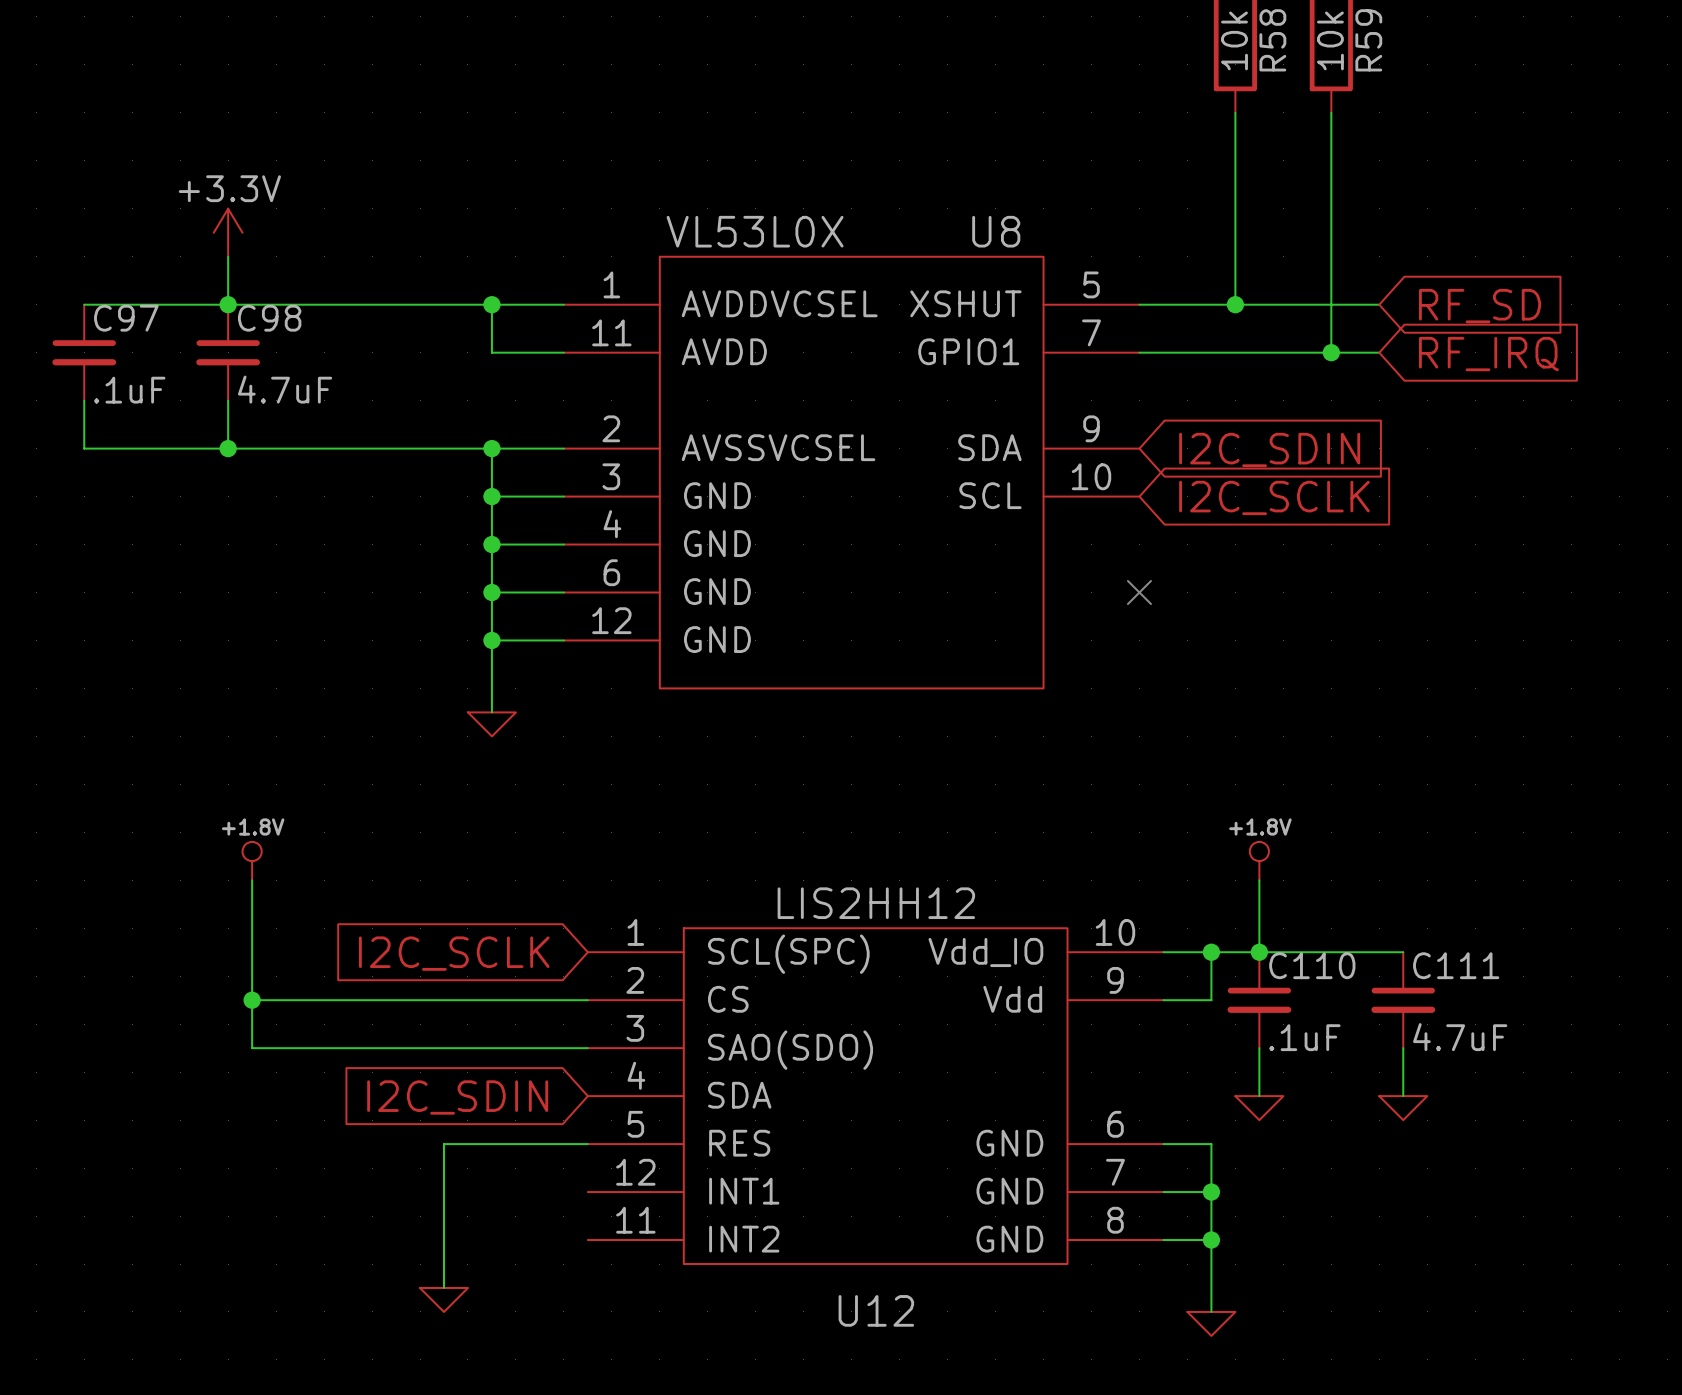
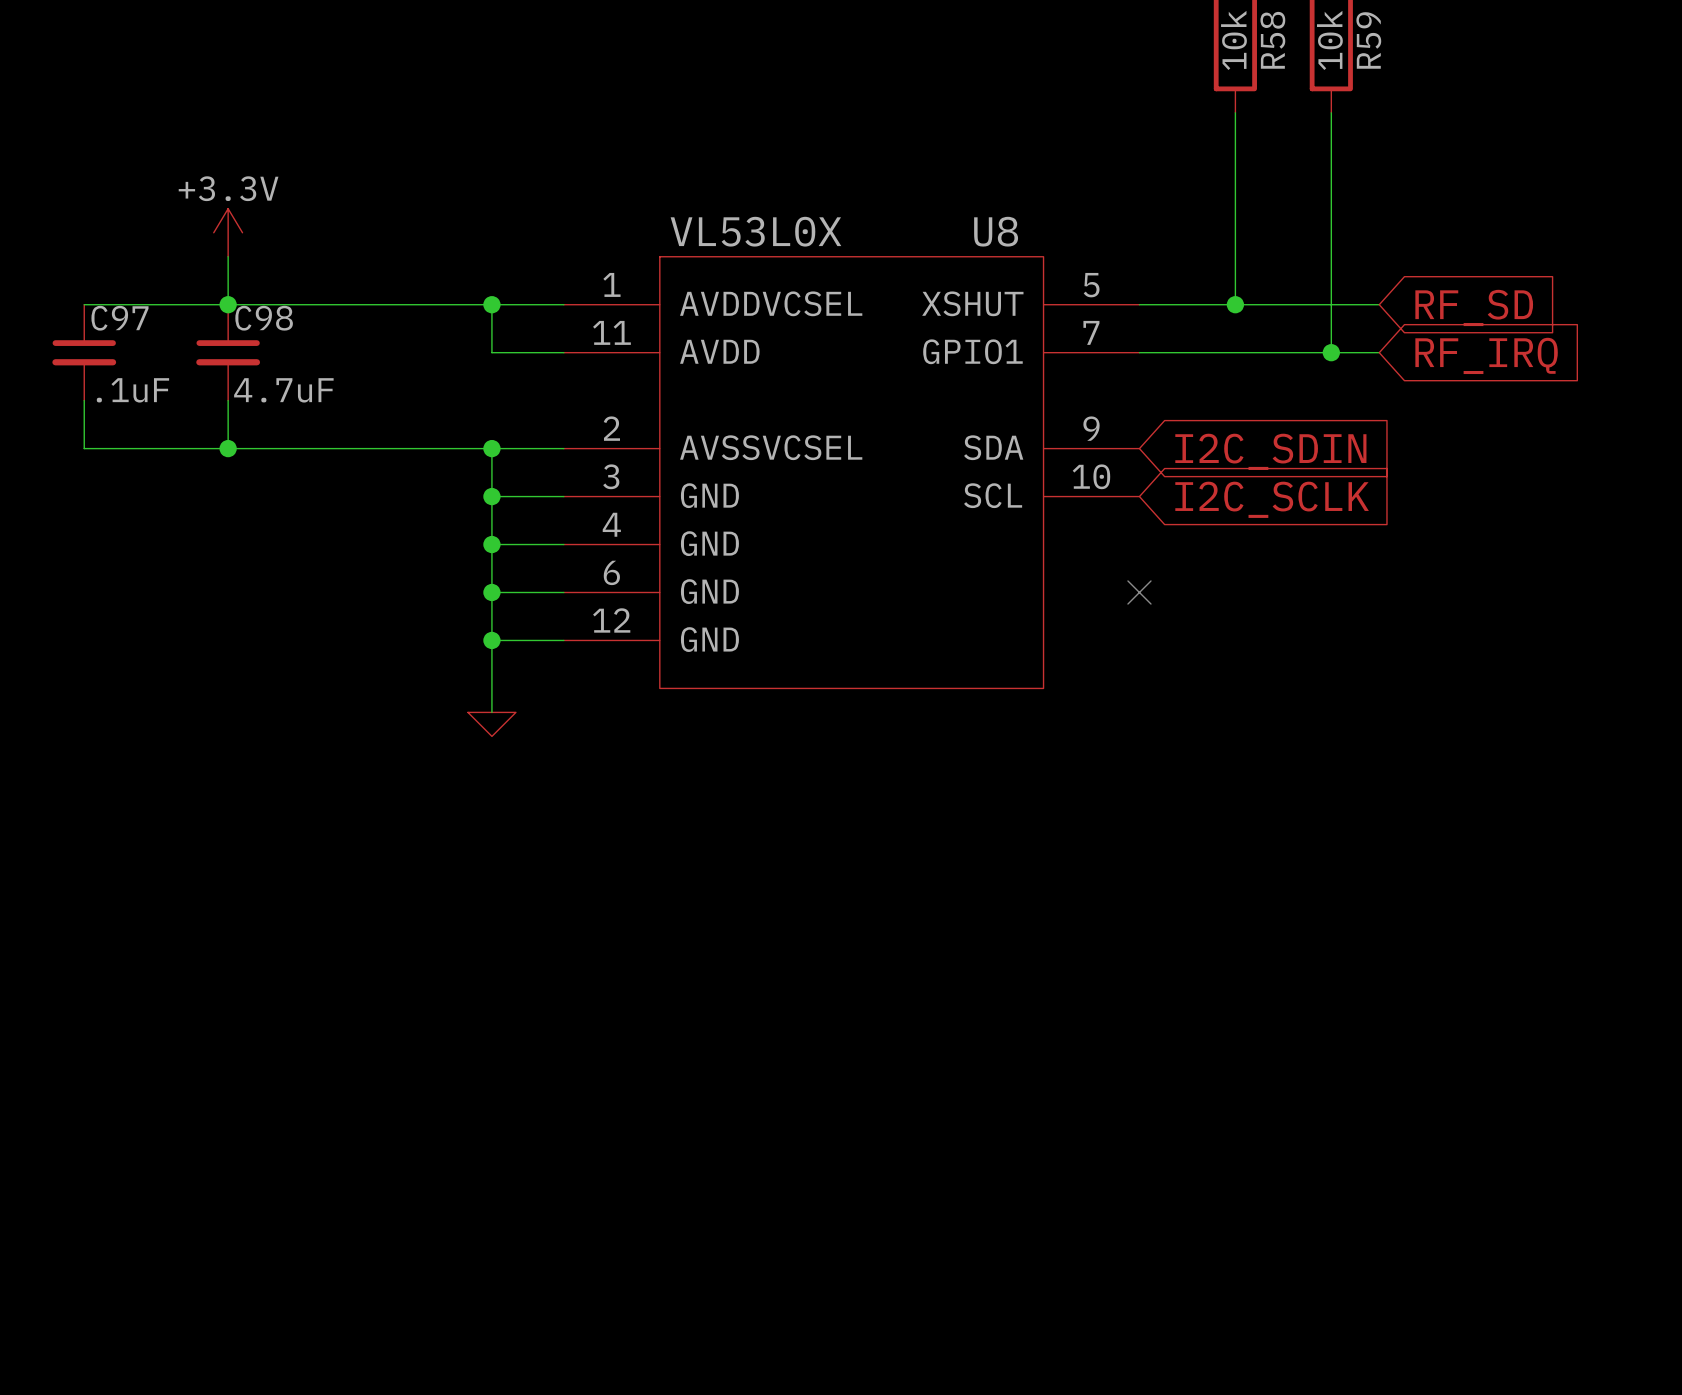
power symbol: +1.8V (252, 861) -> none
power symbol: +1.8V (1259, 861) -> none
wire: (252, 880) (252, 1048) (587, 1048) -> none
wire: (1259, 880) (1259, 952) -> none
wire: (1163, 952) (1403, 952) -> none
wire: (1211, 952) (1211, 1000) (1163, 1000) -> none
junction: (1211, 952) -> none
junction: (1259, 952) -> none
global label: I2C_SCLK (454, 953) -> none
wire: (252, 1000) (587, 1000) -> none
junction: (252, 1000) -> none
C110: .1uF (1259, 1000) -> none
C111: 4.7uF (1403, 1000) -> none
wire: (1259, 1048) (1259, 1096) -> none
wire: (1403, 1048) (1403, 1096) -> none
U12: LIS2HH12 (875, 1096) -> none
global label: I2C_SDIN (457, 1097) -> none
power symbol: (1259, 1108) -> none
power symbol: (1403, 1108) -> none
wire: (587, 1144) (443, 1144) (443, 1287) -> none
wire: (1163, 1144) (1211, 1144) (1211, 1311) -> none
wire: (1163, 1192) (1211, 1192) -> none
junction: (1211, 1192) -> none
wire: (1163, 1240) (1211, 1240) -> none
junction: (1211, 1240) -> none
power symbol: (443, 1299) -> none
power symbol: (1211, 1323) -> none

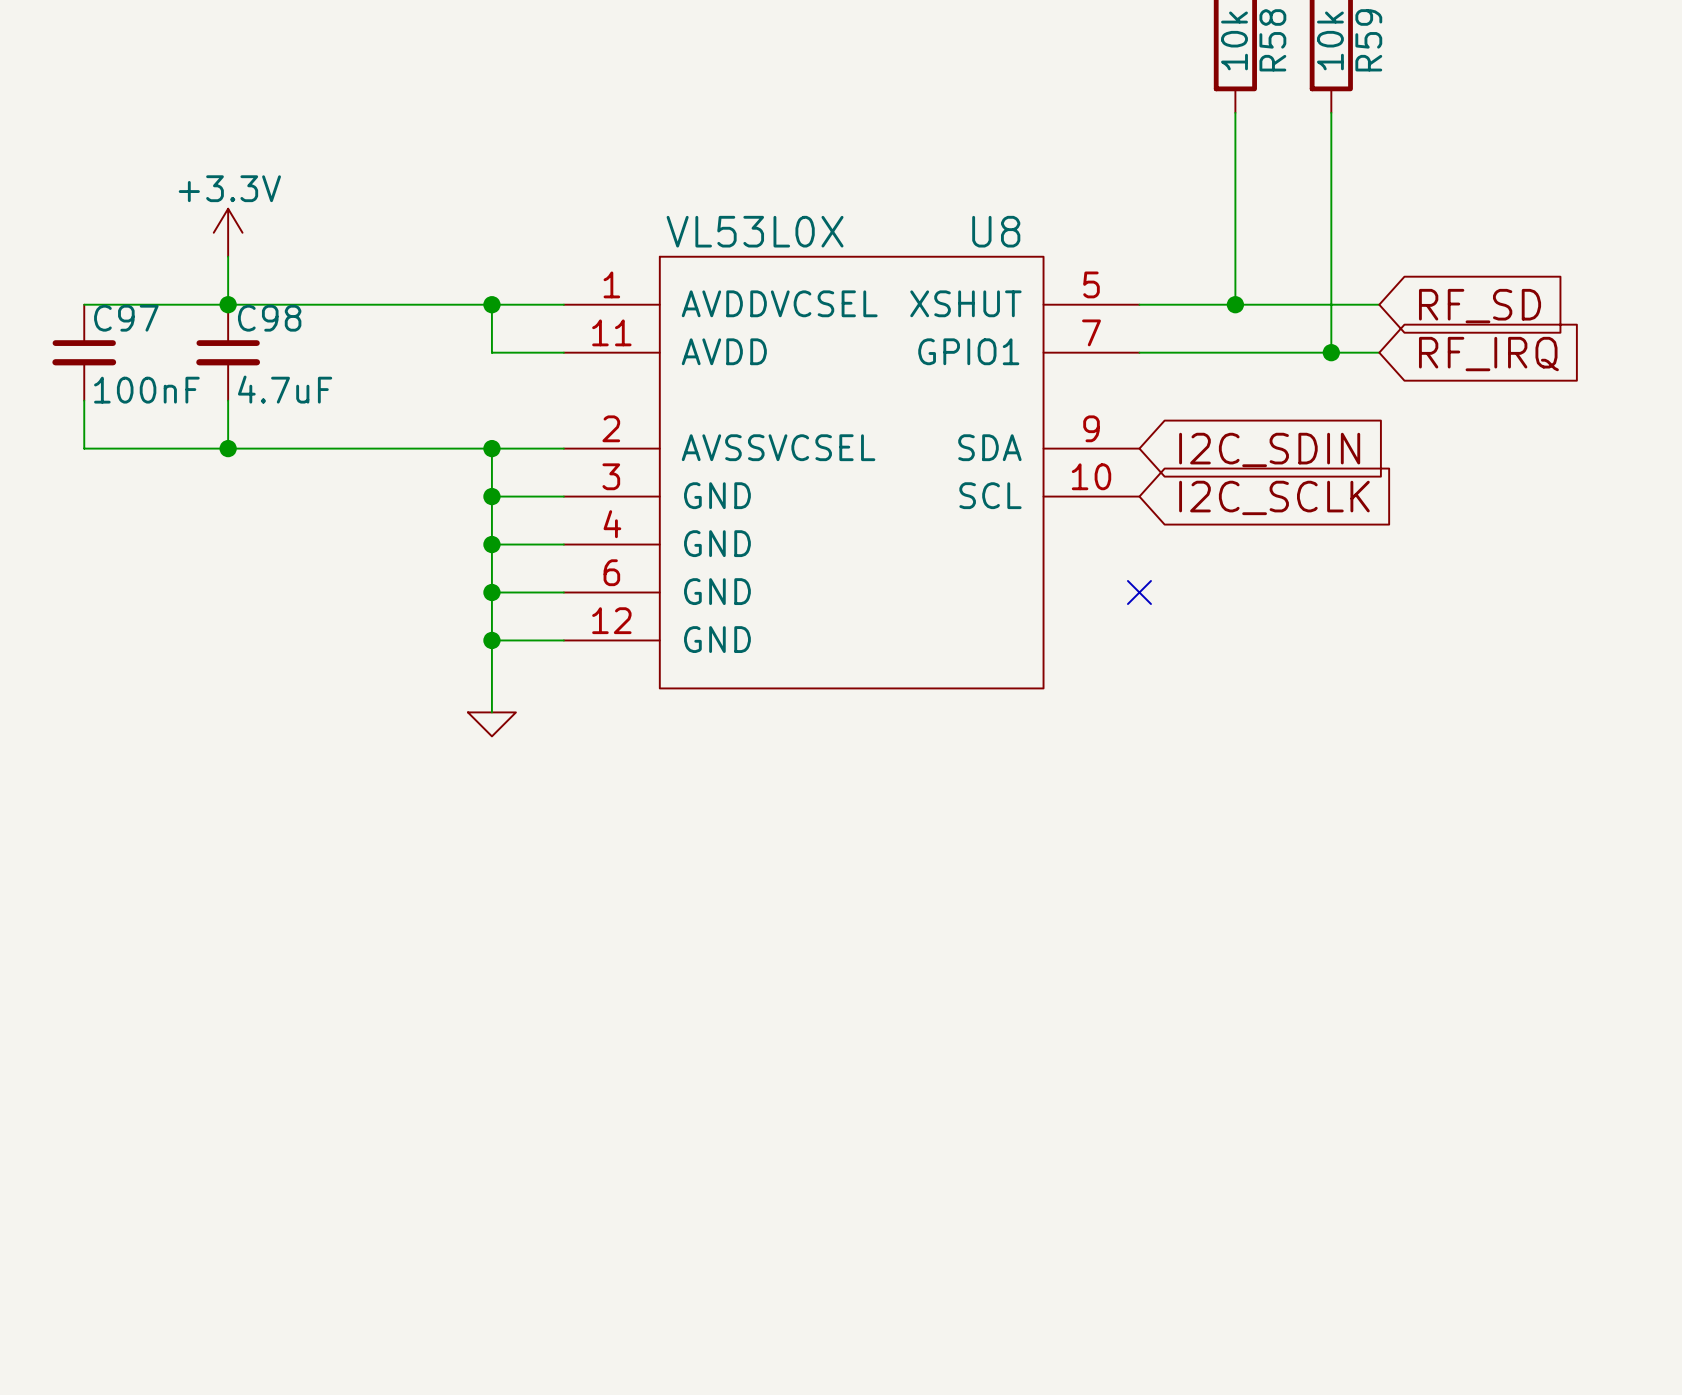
C97 value: .1uF (132, 390) -> 100nF (146, 390)

